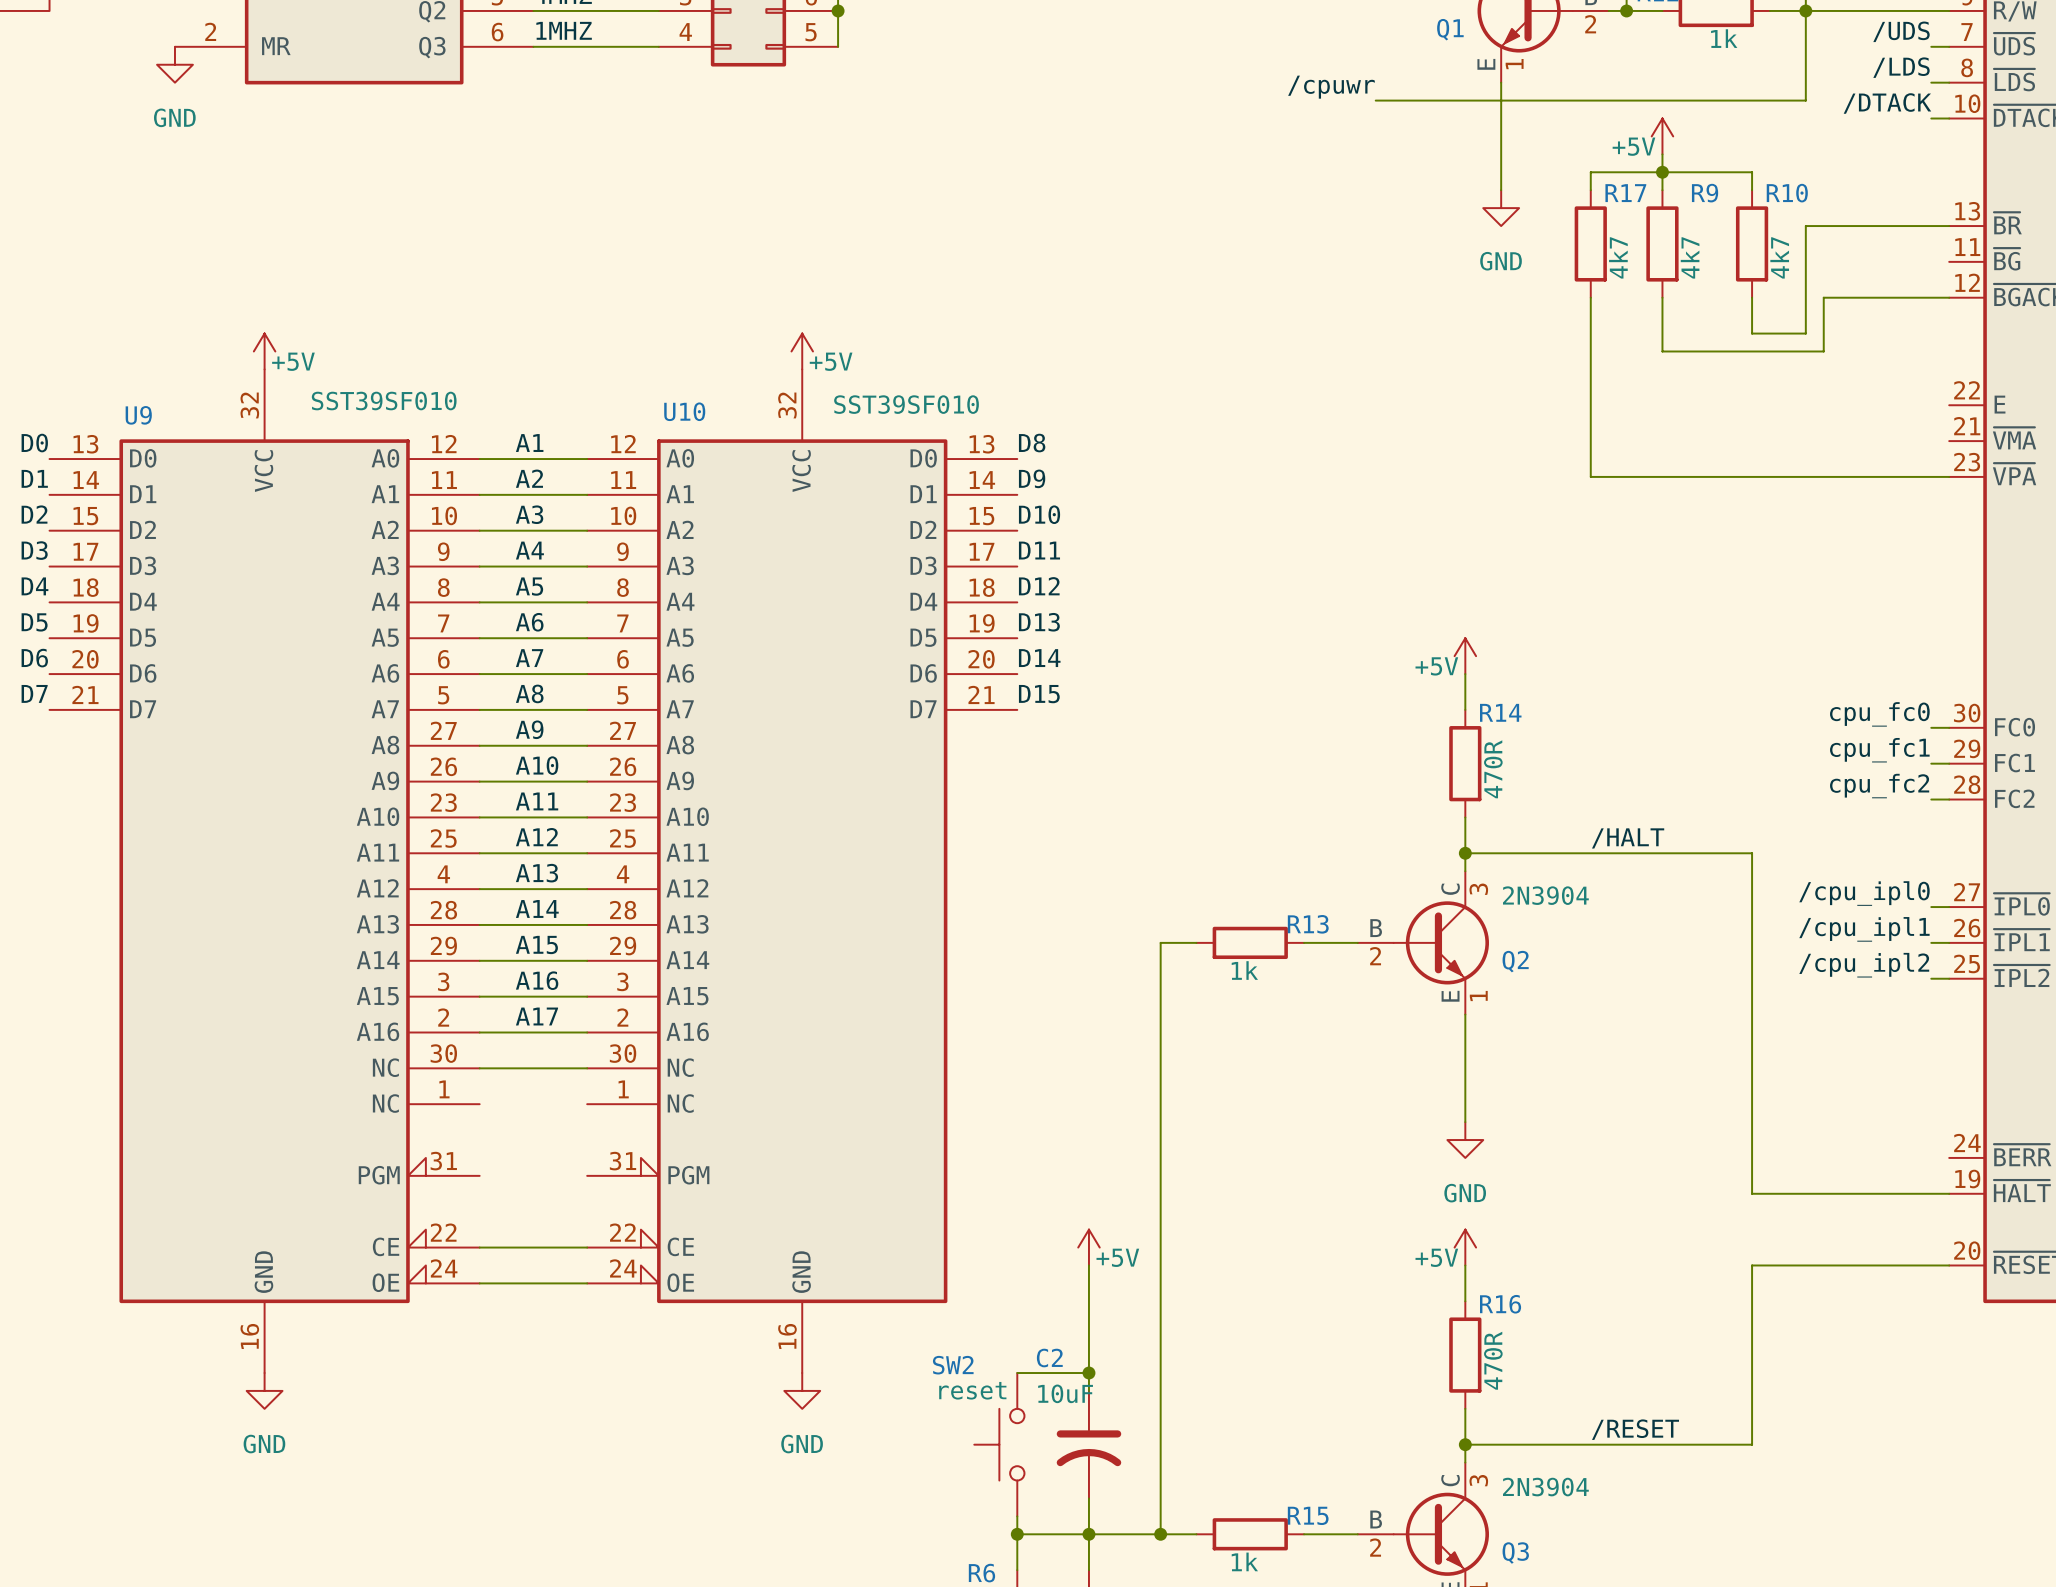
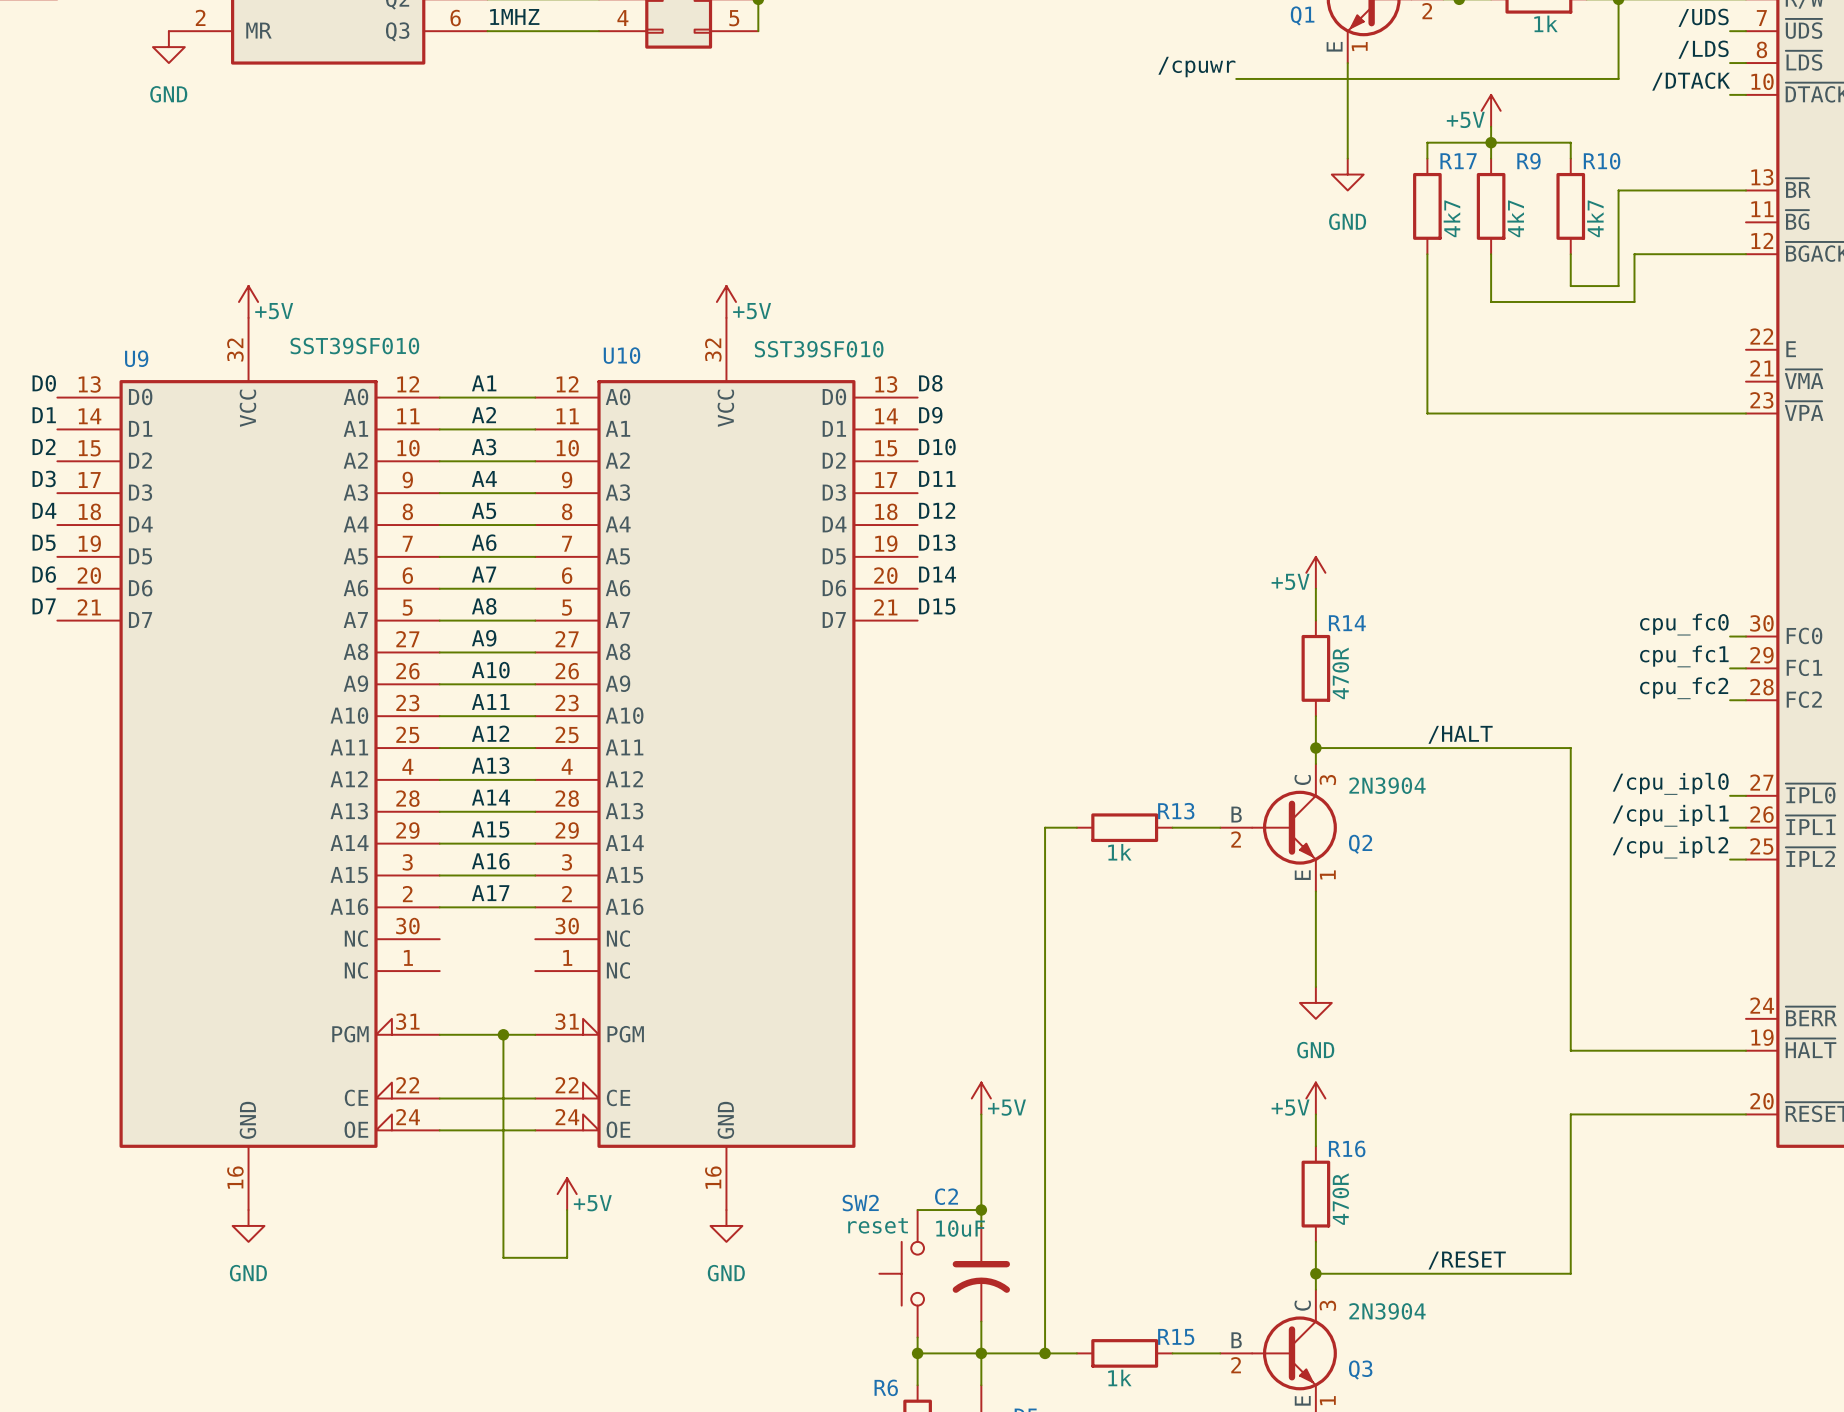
wire: (479, 1068) (587, 1068) -> (439, 1034) (535, 1034)
wire: none -> (503, 1034) (503, 1257) (567, 1257) (567, 1210)
junction: none -> (503, 1034)
power symbol: none -> +5V (567, 1194)

